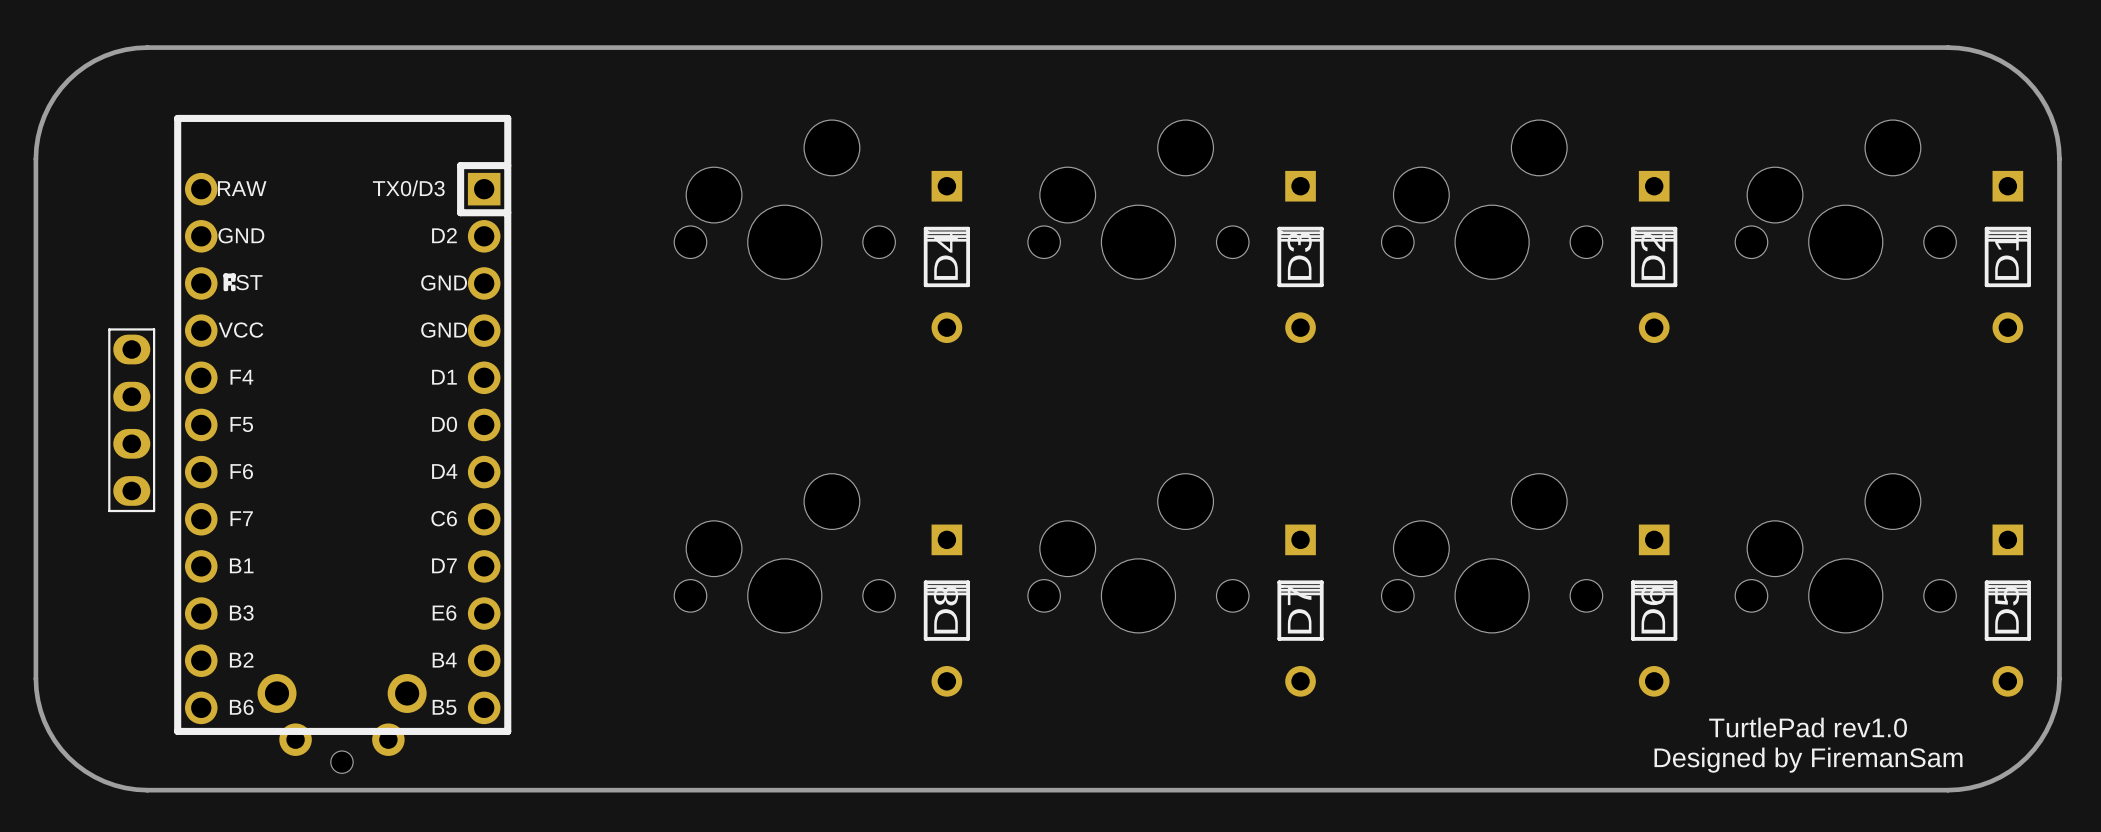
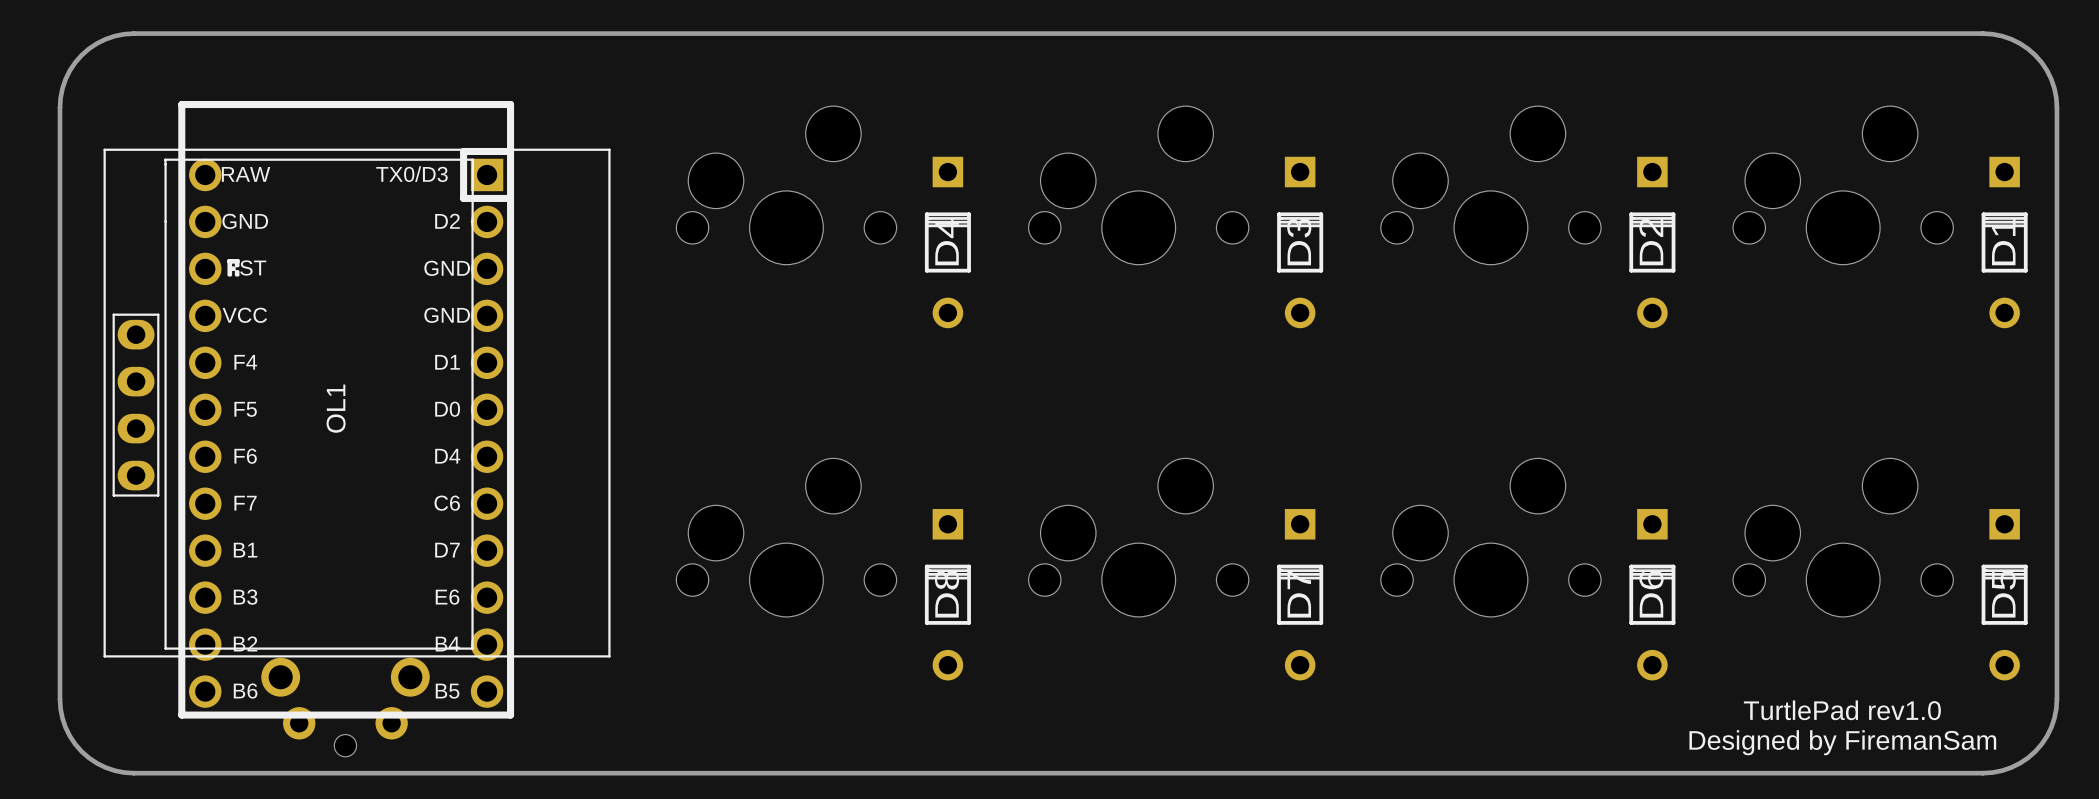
board edge: (147, 47) (1948, 47) (1980, 52) (2009, 66) (2034, 88) (2050, 116) (2058, 148) (2059, 678) (2054, 711) (2040, 740) (2026, 757) (2009, 771) (1980, 785) (1948, 790) (147, 790) (114, 785) (85, 771) (61, 749) (44, 721) (36, 689) (35, 158) (38, 137) (44, 116) (54, 97) (68, 80) (85, 66) (104, 56) (125, 49) (147, 47) -> (133, 33) (1982, 33) (2011, 39) (2028, 48) (2041, 62) (2051, 79) (2056, 107) (2056, 699) (2051, 727) (2041, 744) (2028, 757) (2011, 767) (1982, 773) (133, 773) (105, 767) (88, 757) (75, 744) (65, 727) (60, 708) (60, 107) (65, 79) (81, 55) (105, 39) (133, 33)
OL1: none -> (357, 403)
text position: TurtlePad rev1.0 (1808, 727) -> TurtlePad rev1.0 (1842, 710)
text position: Designed by FiremanSam (1808, 760) -> Designed by FiremanSam (1842, 742)

